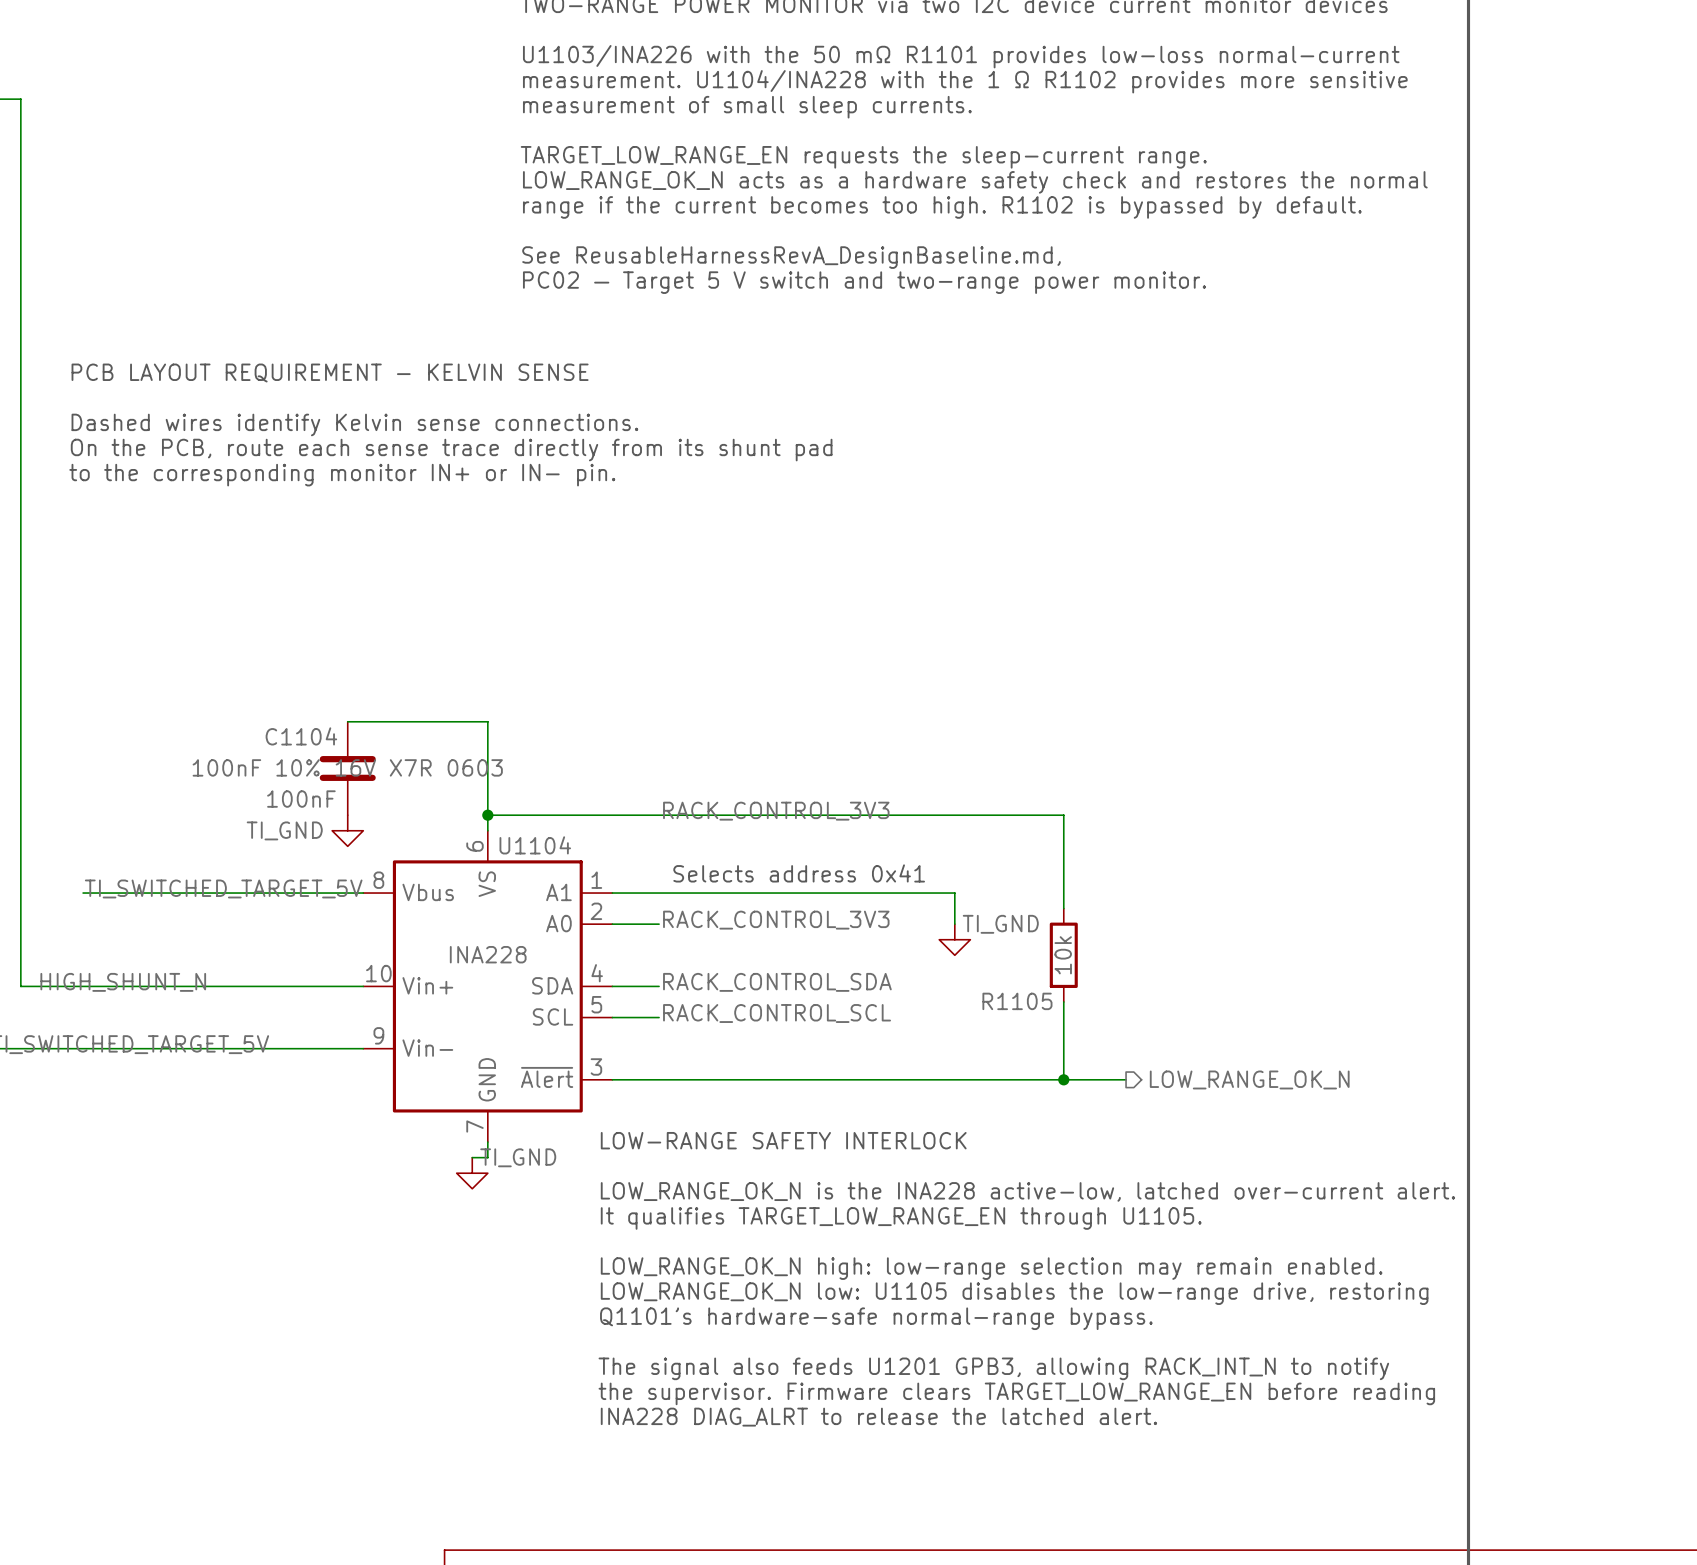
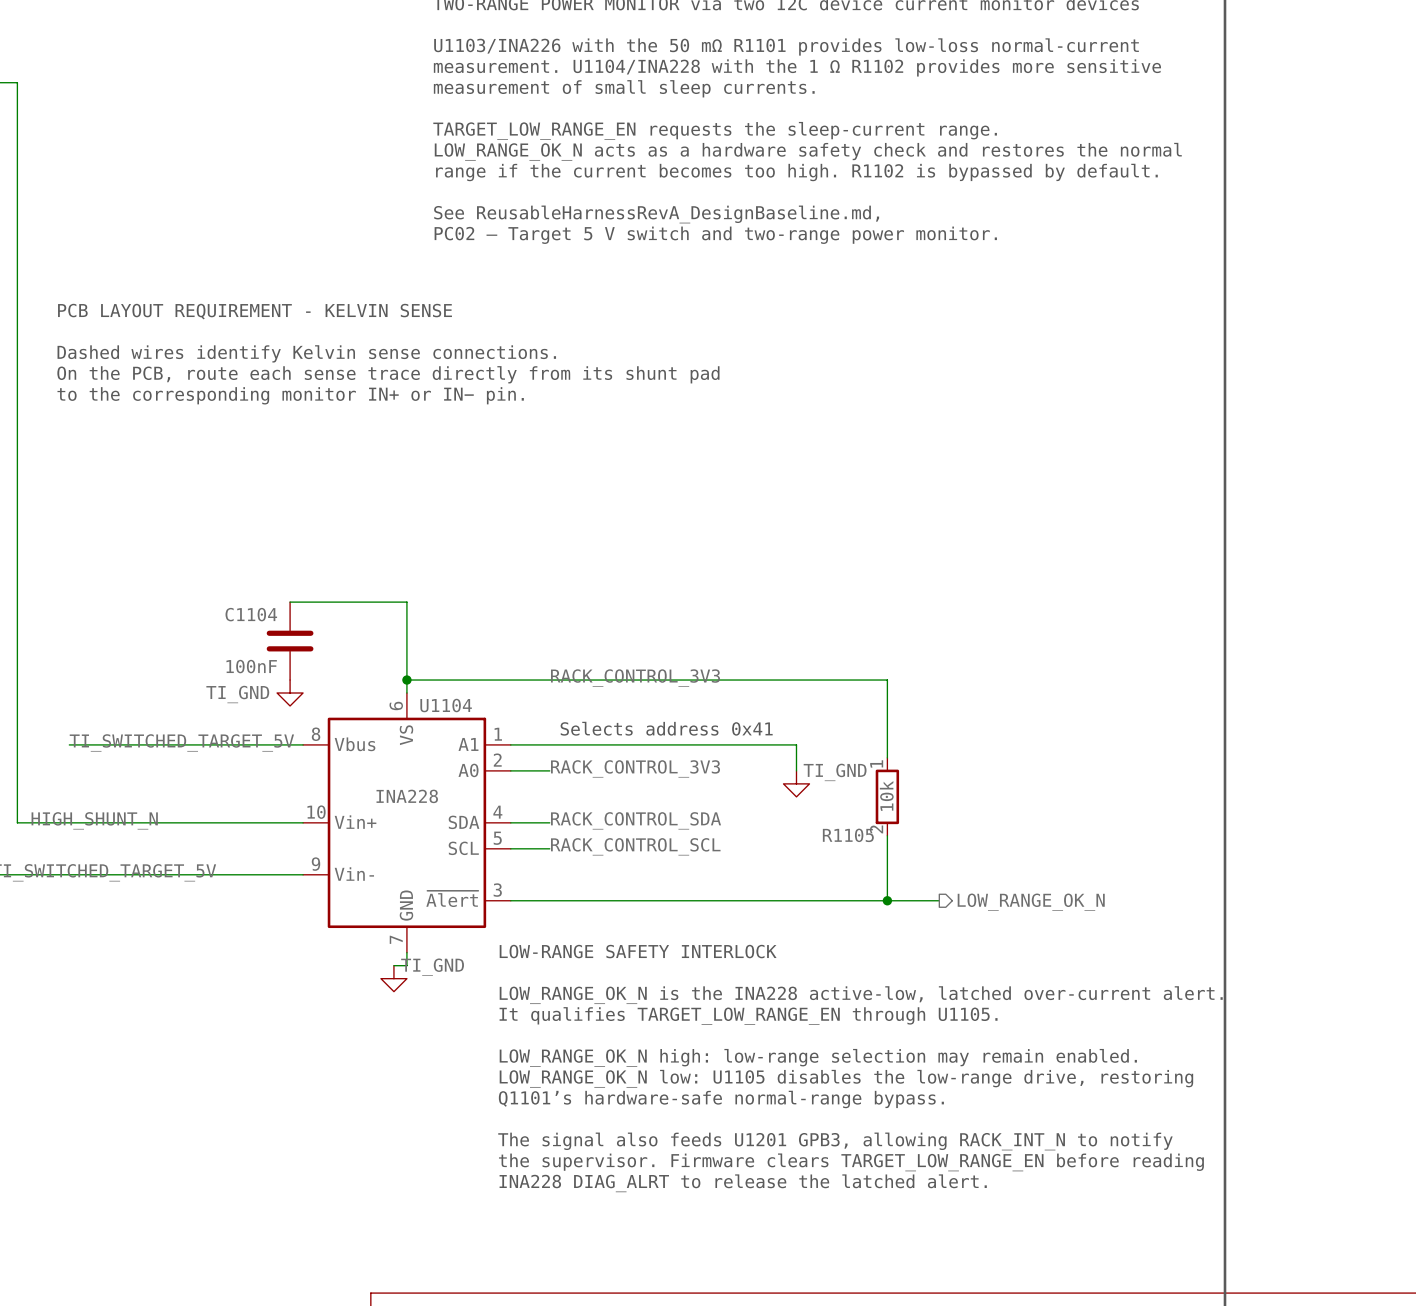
C1104 text: 100nF 10% 16V X7R 0603 (347, 767) -> none
R1105 pin number: none -> 1 (876, 763)
R1105 pin number: none -> 2 (876, 829)

